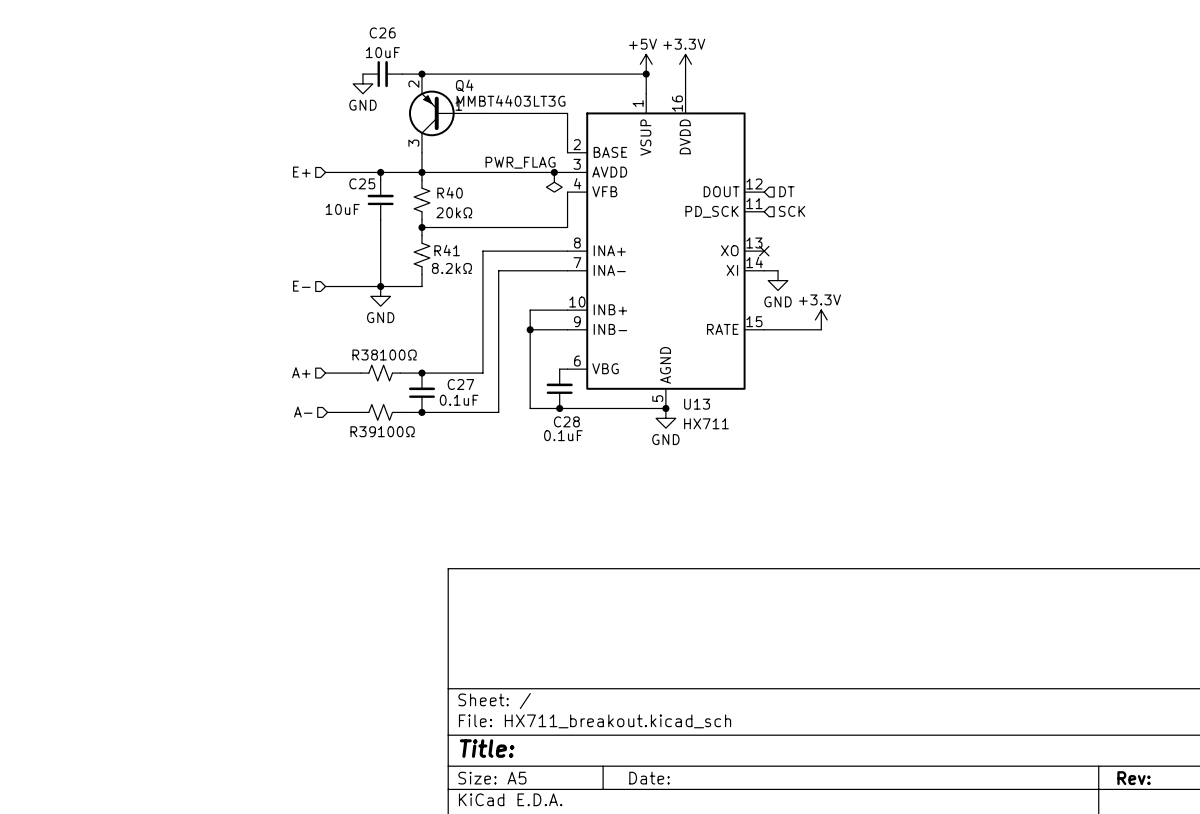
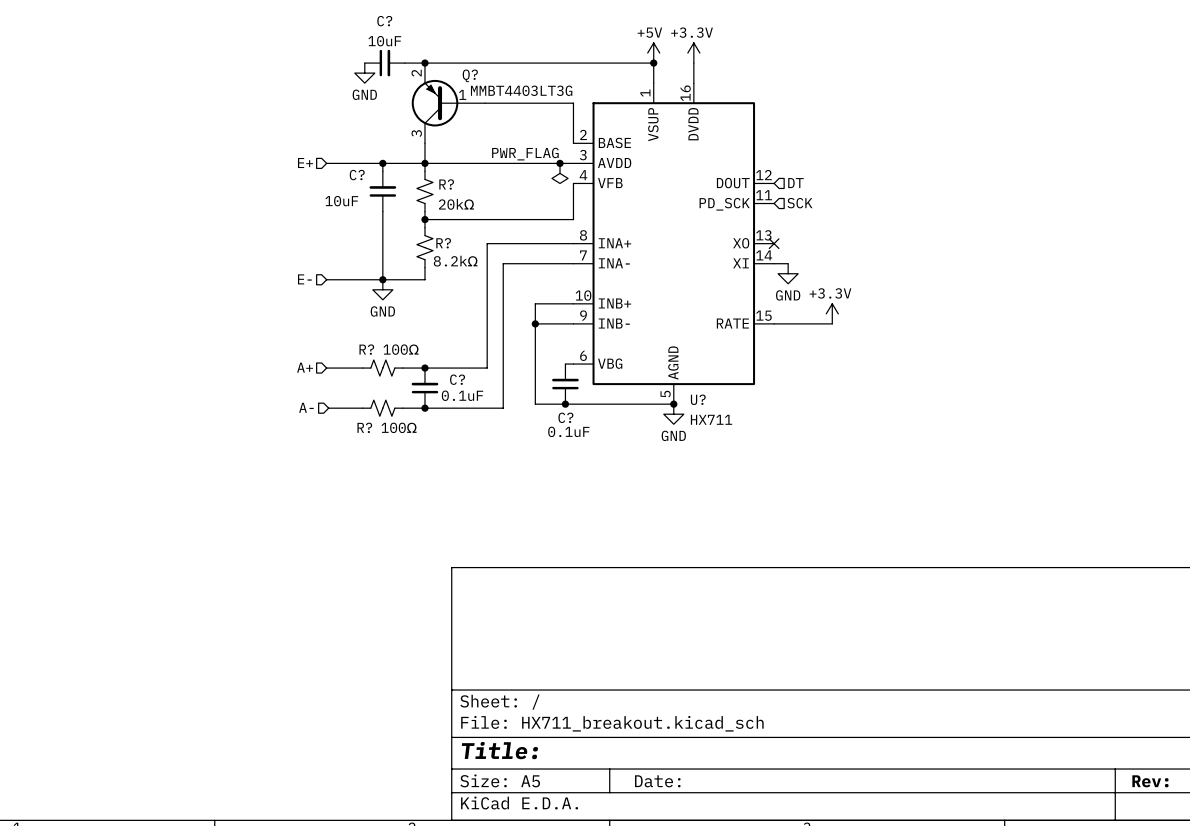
C26 name: C26 (382, 32) -> C? (384, 21)
Q4 name: Q4 (464, 85) -> Q? (470, 75)
C25 name: C25 (362, 183) -> C? (357, 175)
R40 name: R40 (450, 192) -> R? (446, 184)
R41 name: R41 (447, 250) -> R? (443, 243)
R38 name: R38 (365, 355) -> R? (366, 349)
C27 name: C27 (460, 384) -> C? (457, 379)
U13 name: U13 (697, 404) -> U? (698, 399)
C28 name: C28 (566, 421) -> C? (565, 417)
R39 name: R39 (363, 431) -> R? (364, 427)

